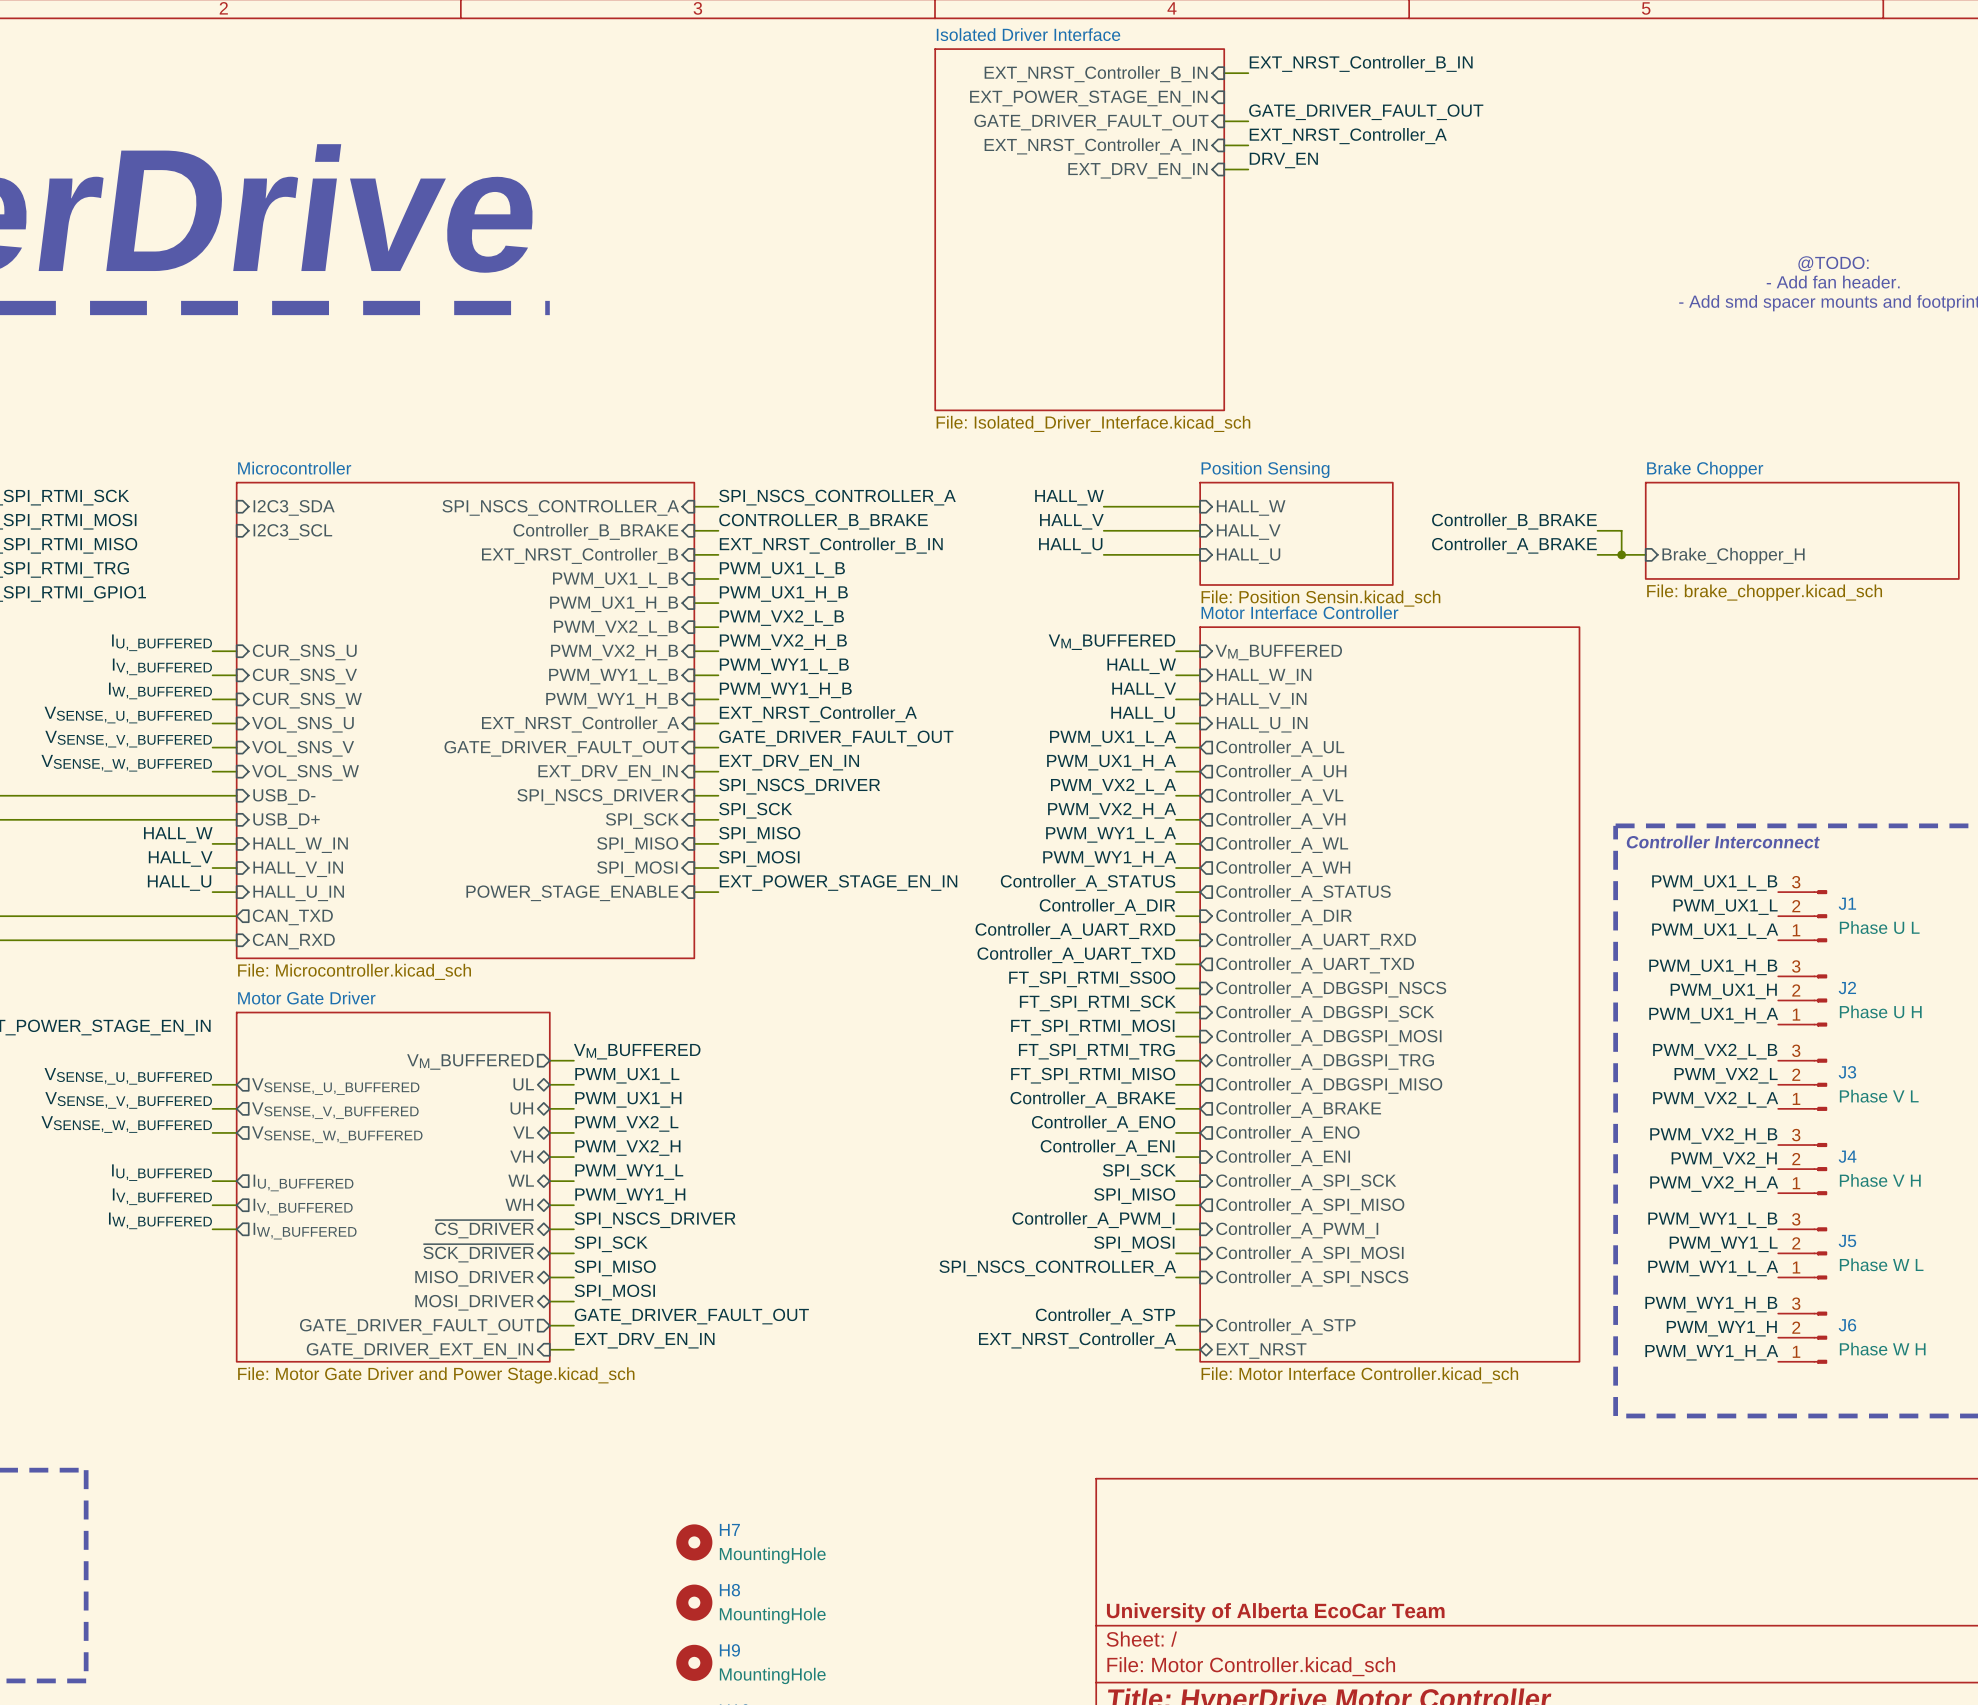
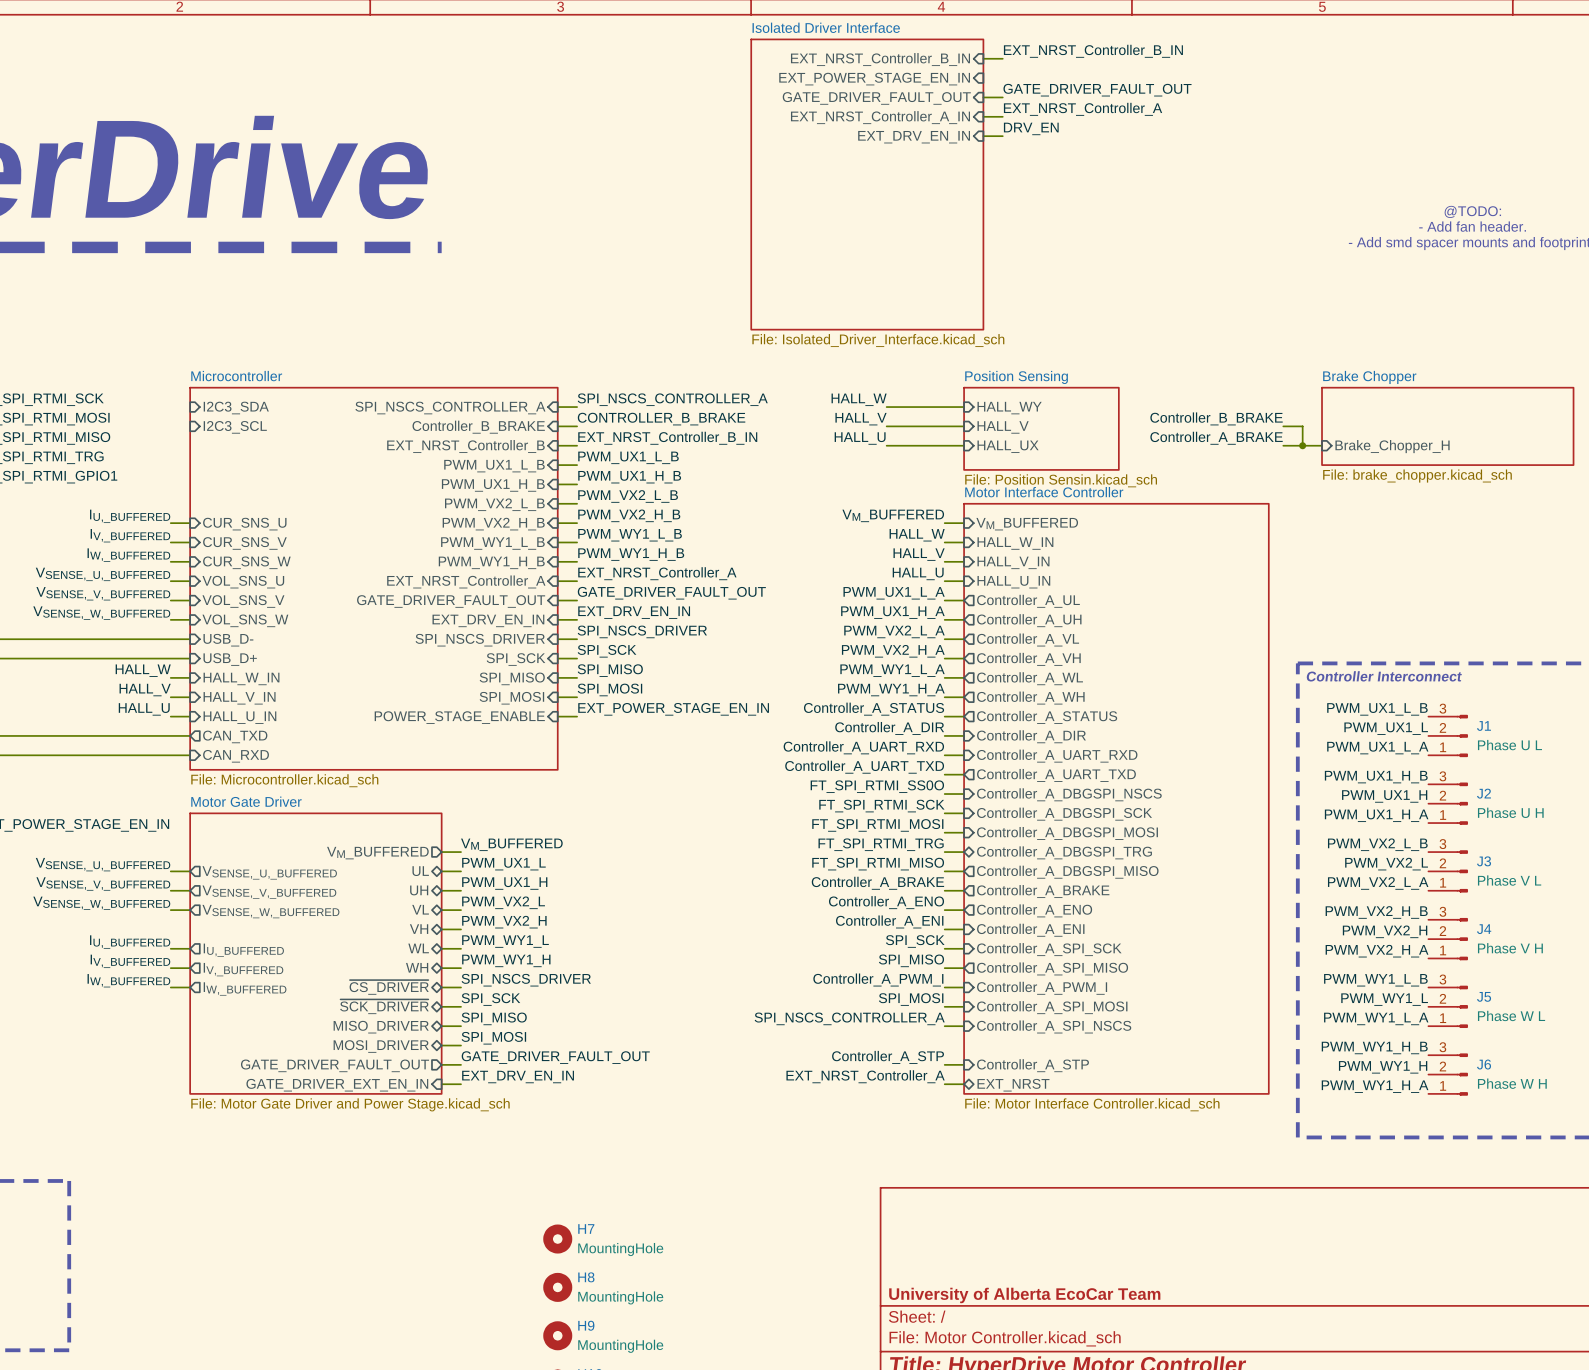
sheet pin: HALL_W (1251, 508) -> HALL_WY (1009, 408)
sheet pin: HALL_U (1248, 556) -> HALL_UX (1008, 446)

